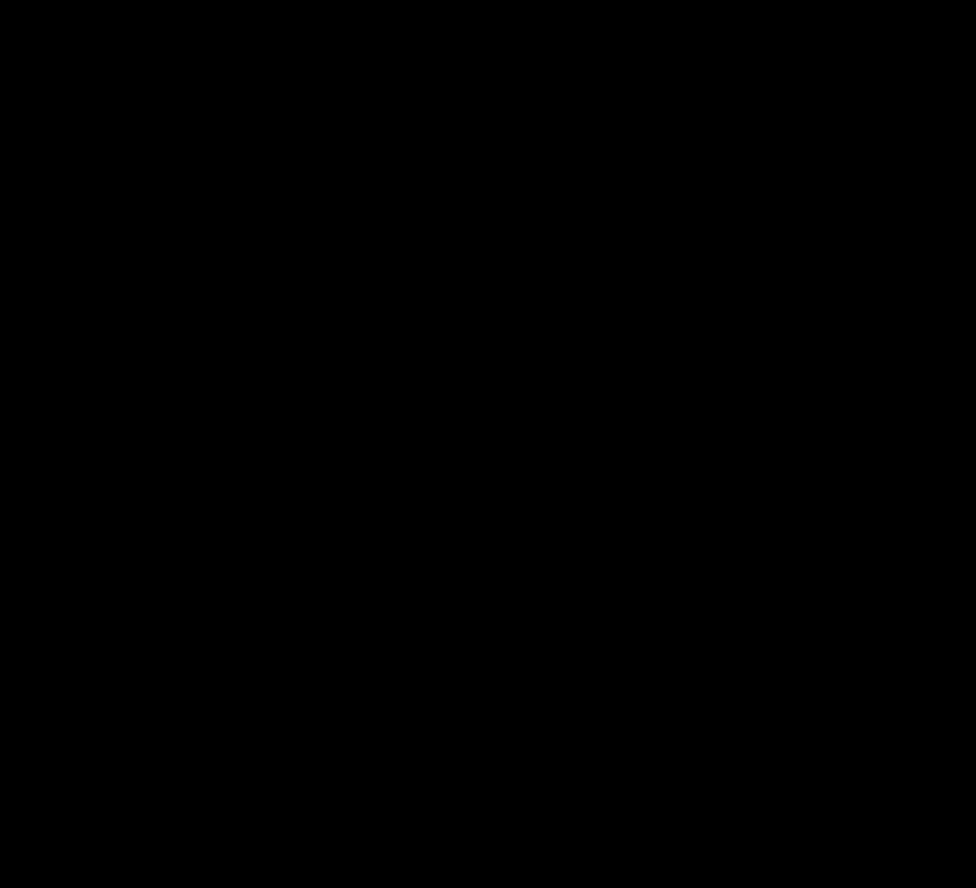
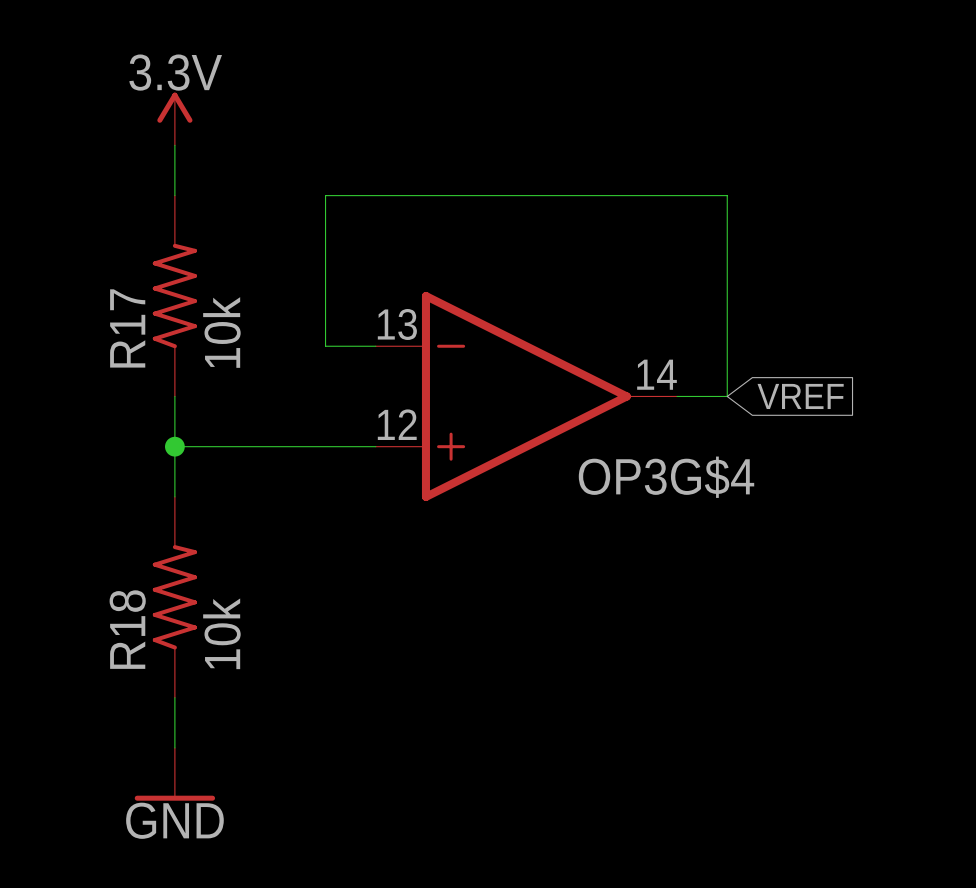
power symbol: none -> 3.3V (174, 119)
wire: none -> (174, 145) (174, 195)
R17: none -> 10k (174, 296)
wire: none -> (375, 346) (325, 346) (325, 195) (727, 195) (727, 396) (677, 396)
wire: none -> (174, 396) (174, 496)
OP3G$4: none -> (526, 396)
global label: none -> VREF (800, 396)
wire: none -> (174, 446) (375, 446)
junction: none -> (174, 446)
R18: none -> 10k (174, 597)
wire: none -> (174, 697) (174, 747)
power symbol: none -> GND (174, 774)

